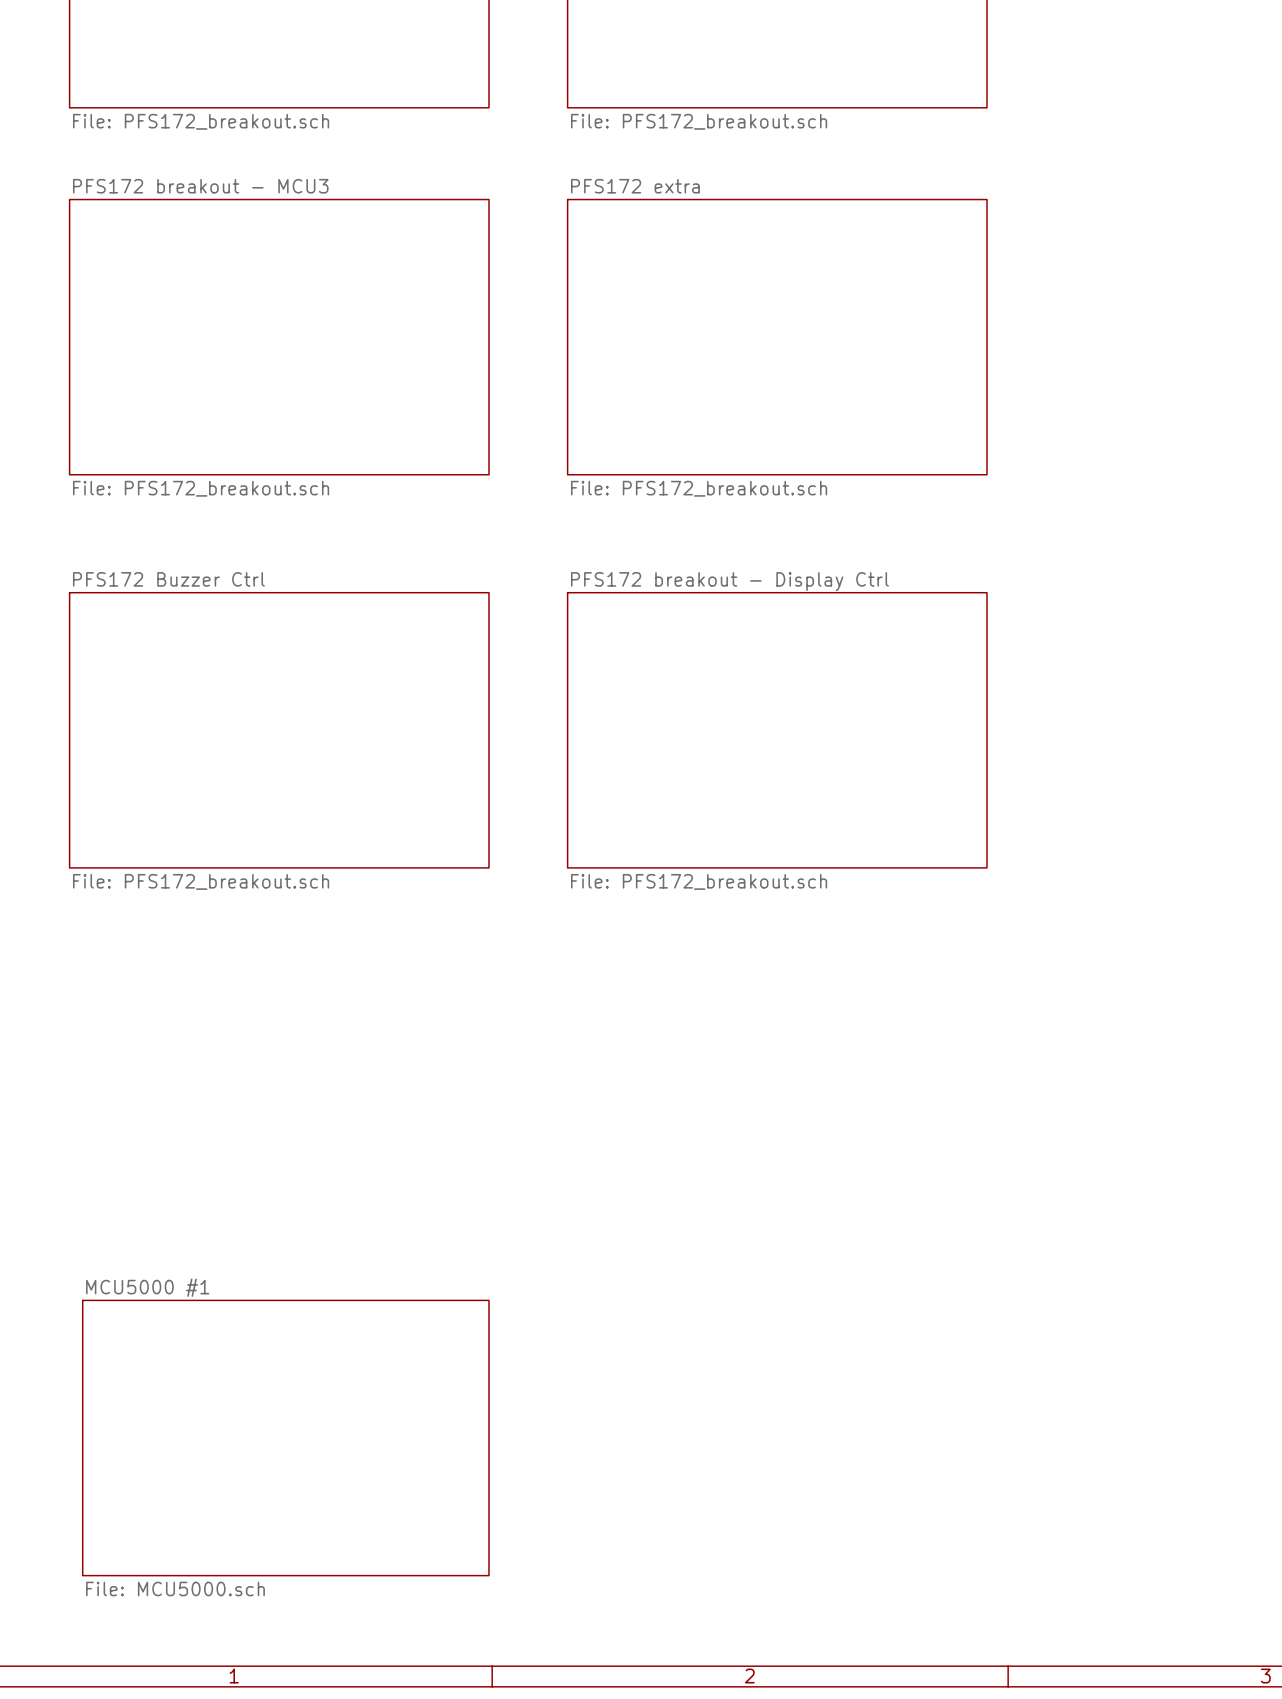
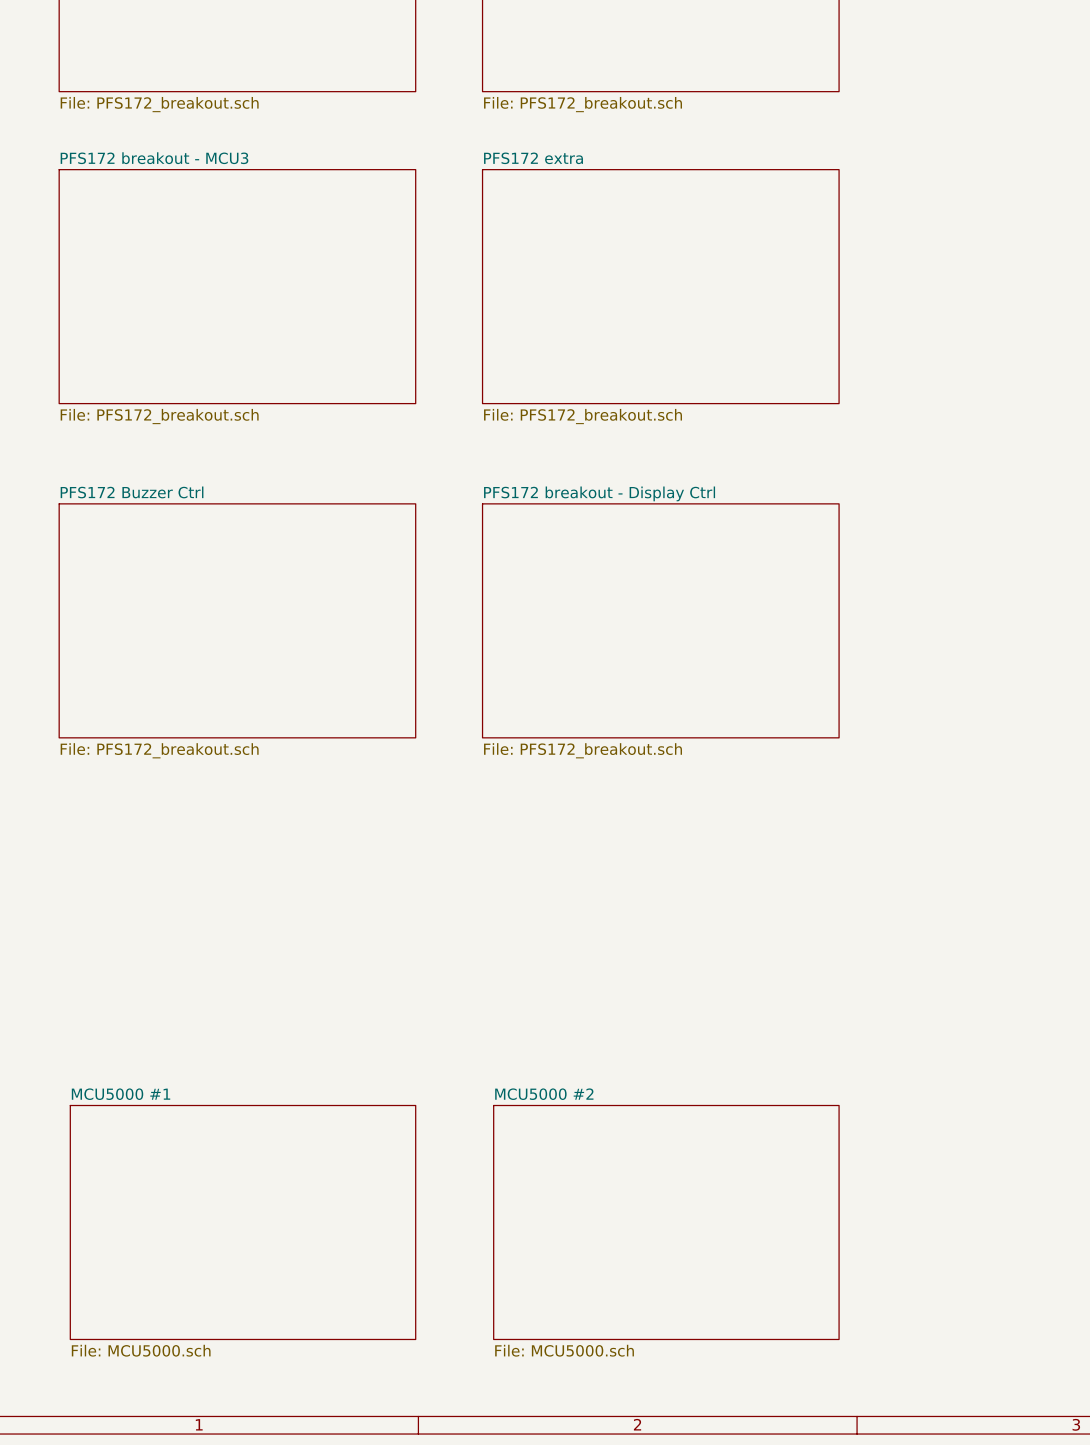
sheet MCU5000 #2: none -> File: MCU5000.sch (666, 1222)

